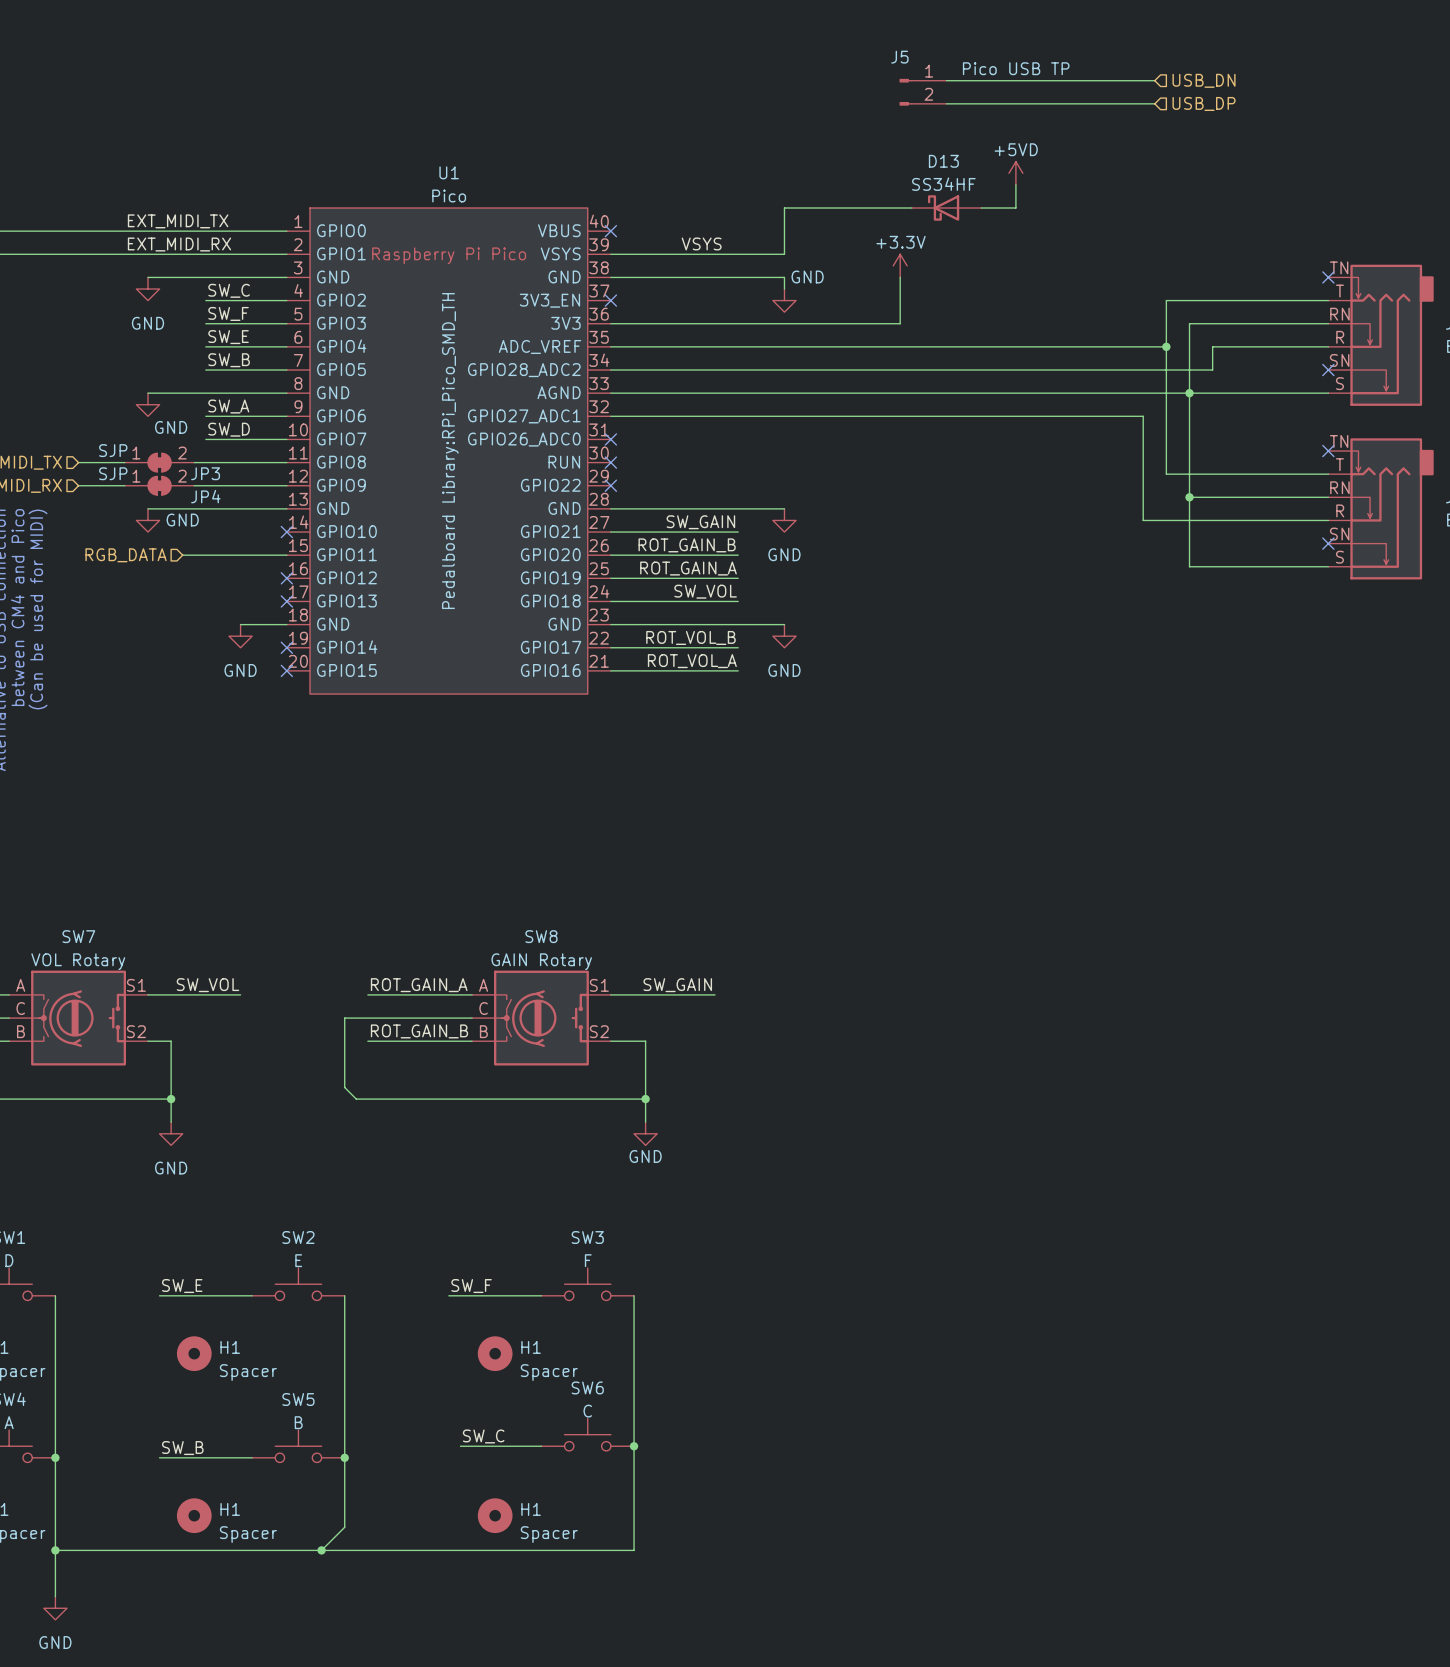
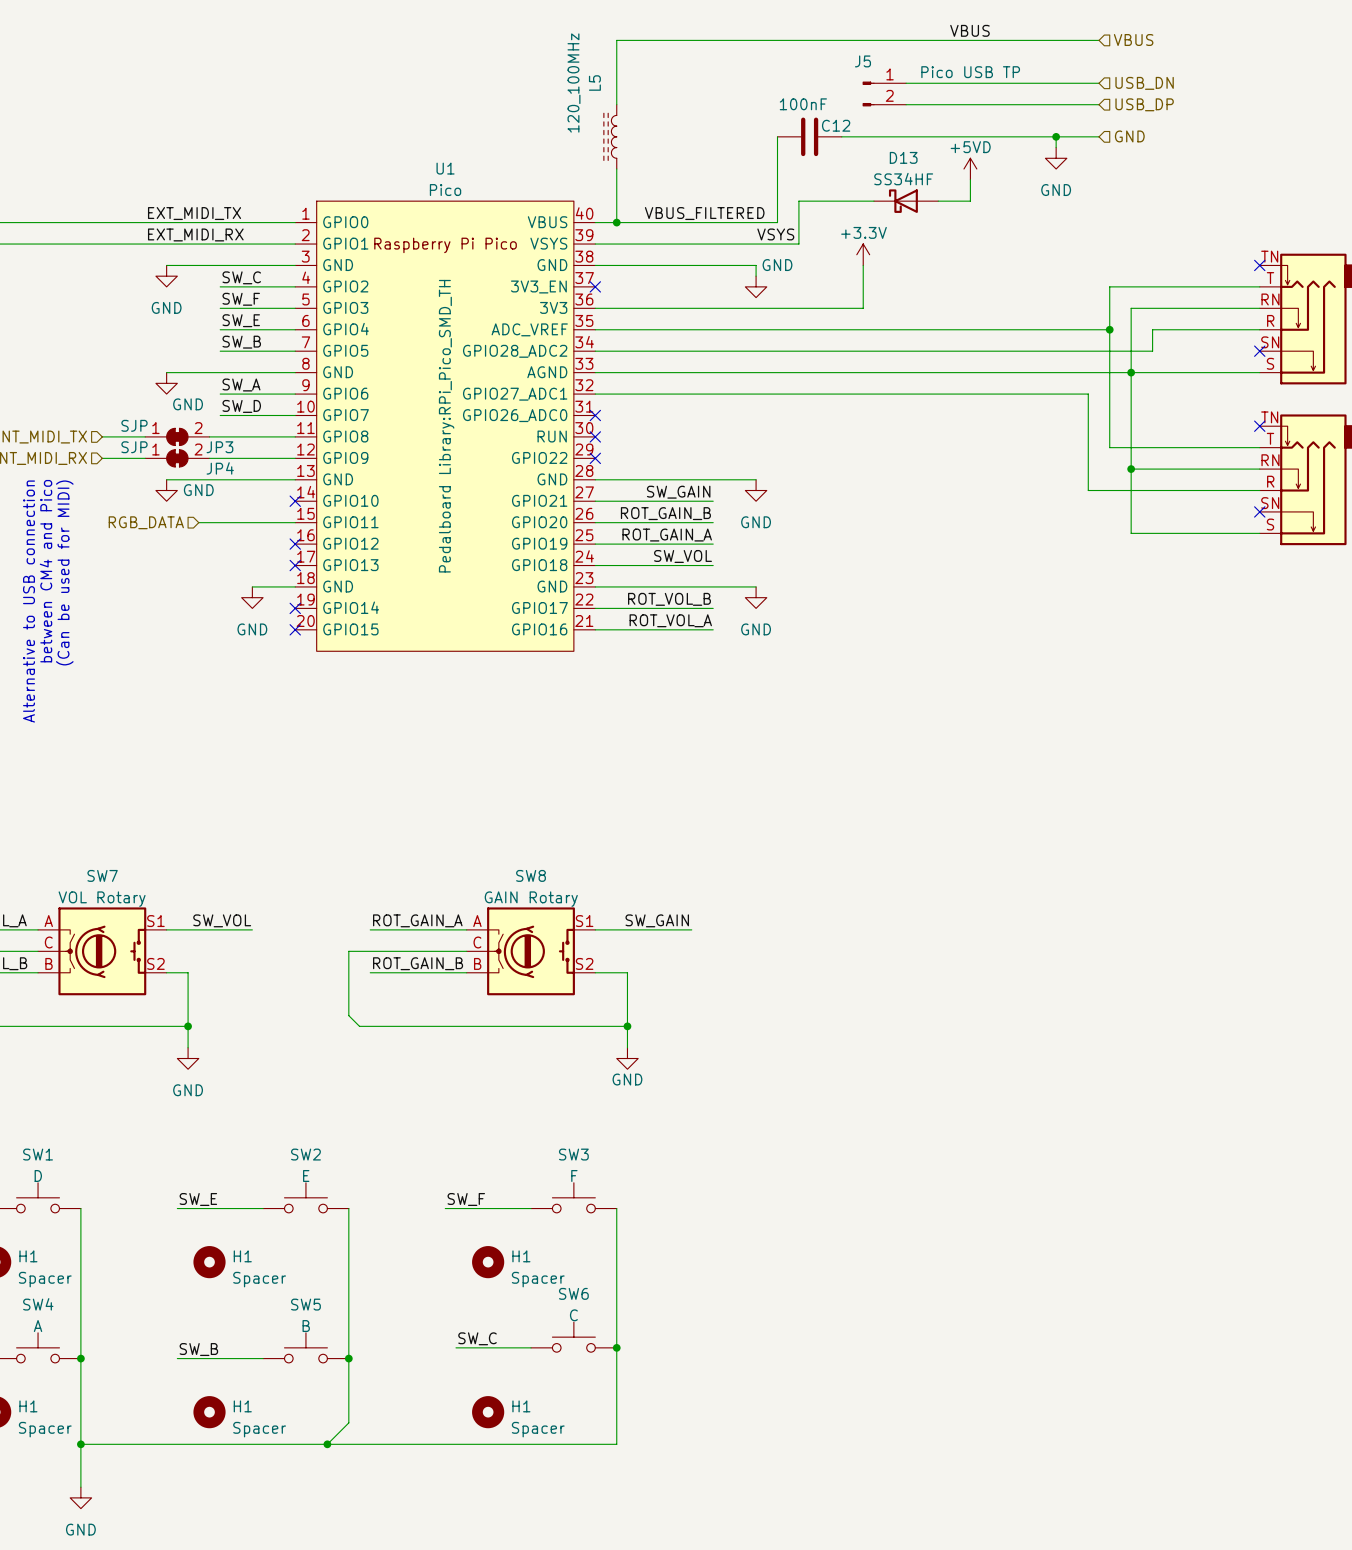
label: none -> VBUS (969, 30)
hierarchical label: none -> VBUS (1133, 40)
wire: none -> (1099, 40) (616, 40) (616, 104)
L5: none -> 120_100MHz (610, 136)
wire: none -> (777, 136) (777, 222) (595, 222)
C12: none -> 100nF (809, 136)
wire: none -> (841, 136) (1099, 136)
wire: none -> (1056, 136) (1056, 147)
junction: none -> (1056, 136)
hierarchical label: none -> GND (1129, 136)
power symbol: none -> GND (1056, 158)
wire: none -> (616, 169) (616, 222)
wire: (830, 208) (784, 208) (784, 254) -> (798, 201) (798, 244) (756, 244)
label: none -> VBUS_FILTERED (704, 213)
no-connect mark: (610, 231) -> none
junction: none -> (616, 222)
label position: VSYS (701, 243) -> VSYS (775, 234)

